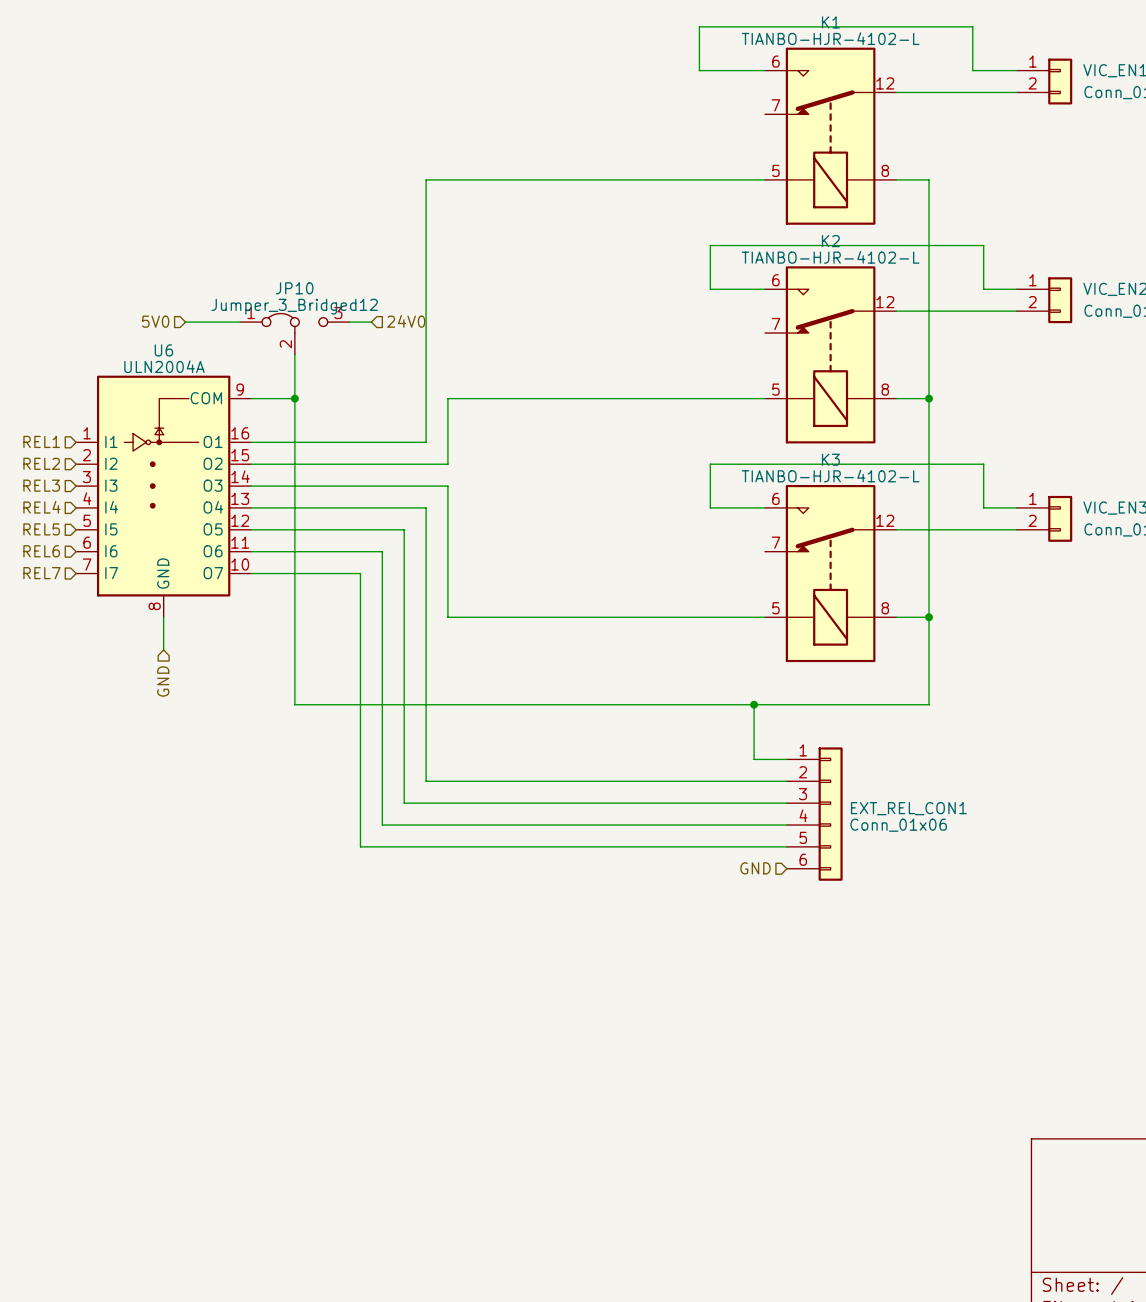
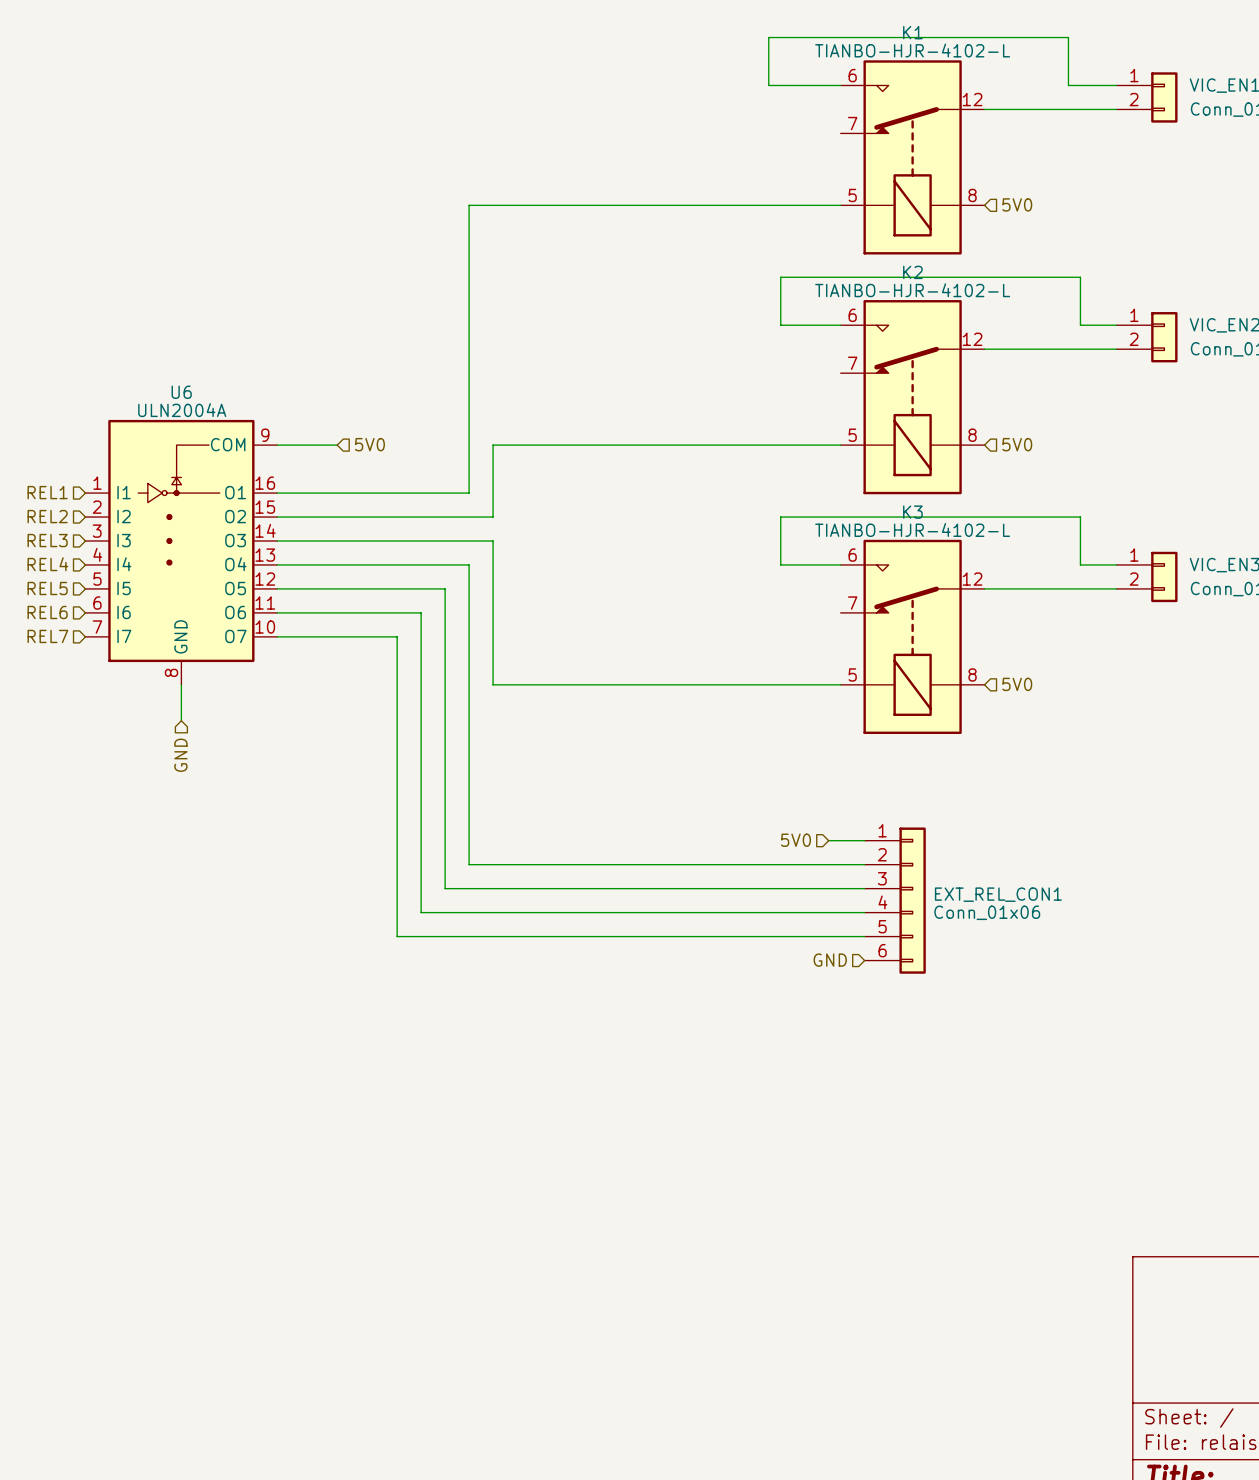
wire: (896, 179) (929, 179) (929, 704) (294, 704) (294, 354) -> none
hierarchical label: none -> 5V0 (1017, 204)
hierarchical label rotation: 0° (155, 321) -> 180° (369, 444)
hierarchical label position: 5V0 (155, 321) -> 5V0 (369, 444)
hierarchical label: 24V0 (406, 321) -> none
wire: (185, 322) (240, 322) -> none
wire: (349, 322) (371, 322) -> none
JP10: Jumper_3_Bridged12 (294, 334) -> none
wire: none -> (325, 445) (337, 445)
junction: (294, 398) -> none
wire: (896, 398) (929, 398) -> none
hierarchical label: none -> 5V0 (1017, 444)
junction: (929, 398) -> none
hierarchical label: none -> 5V0 (1017, 684)
wire: (896, 617) (929, 617) -> none
junction: (929, 617) -> none
wire: (754, 704) (754, 759) -> none
junction: (754, 704) -> none
hierarchical label: none -> 5V0 (795, 840)

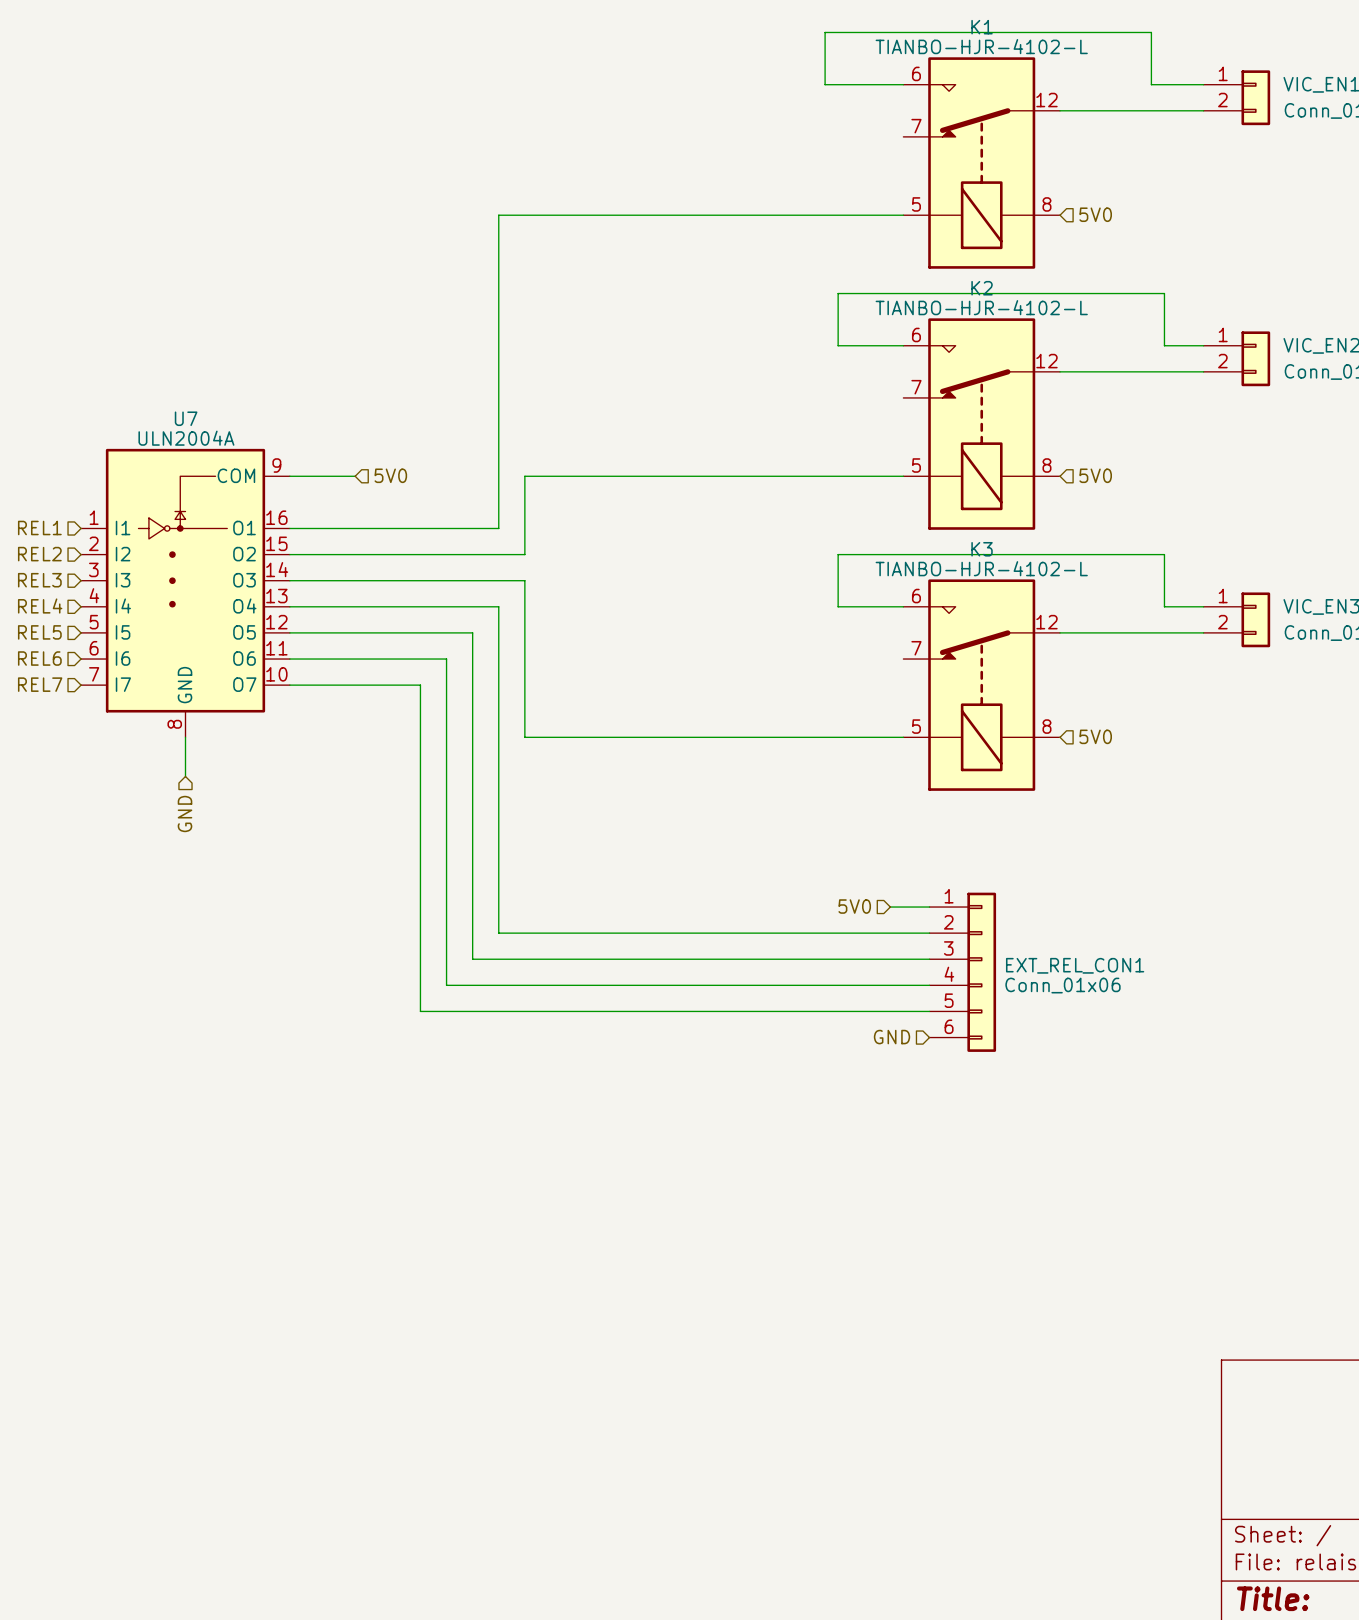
U6 name: U6 (181, 392) -> U7 (186, 418)

